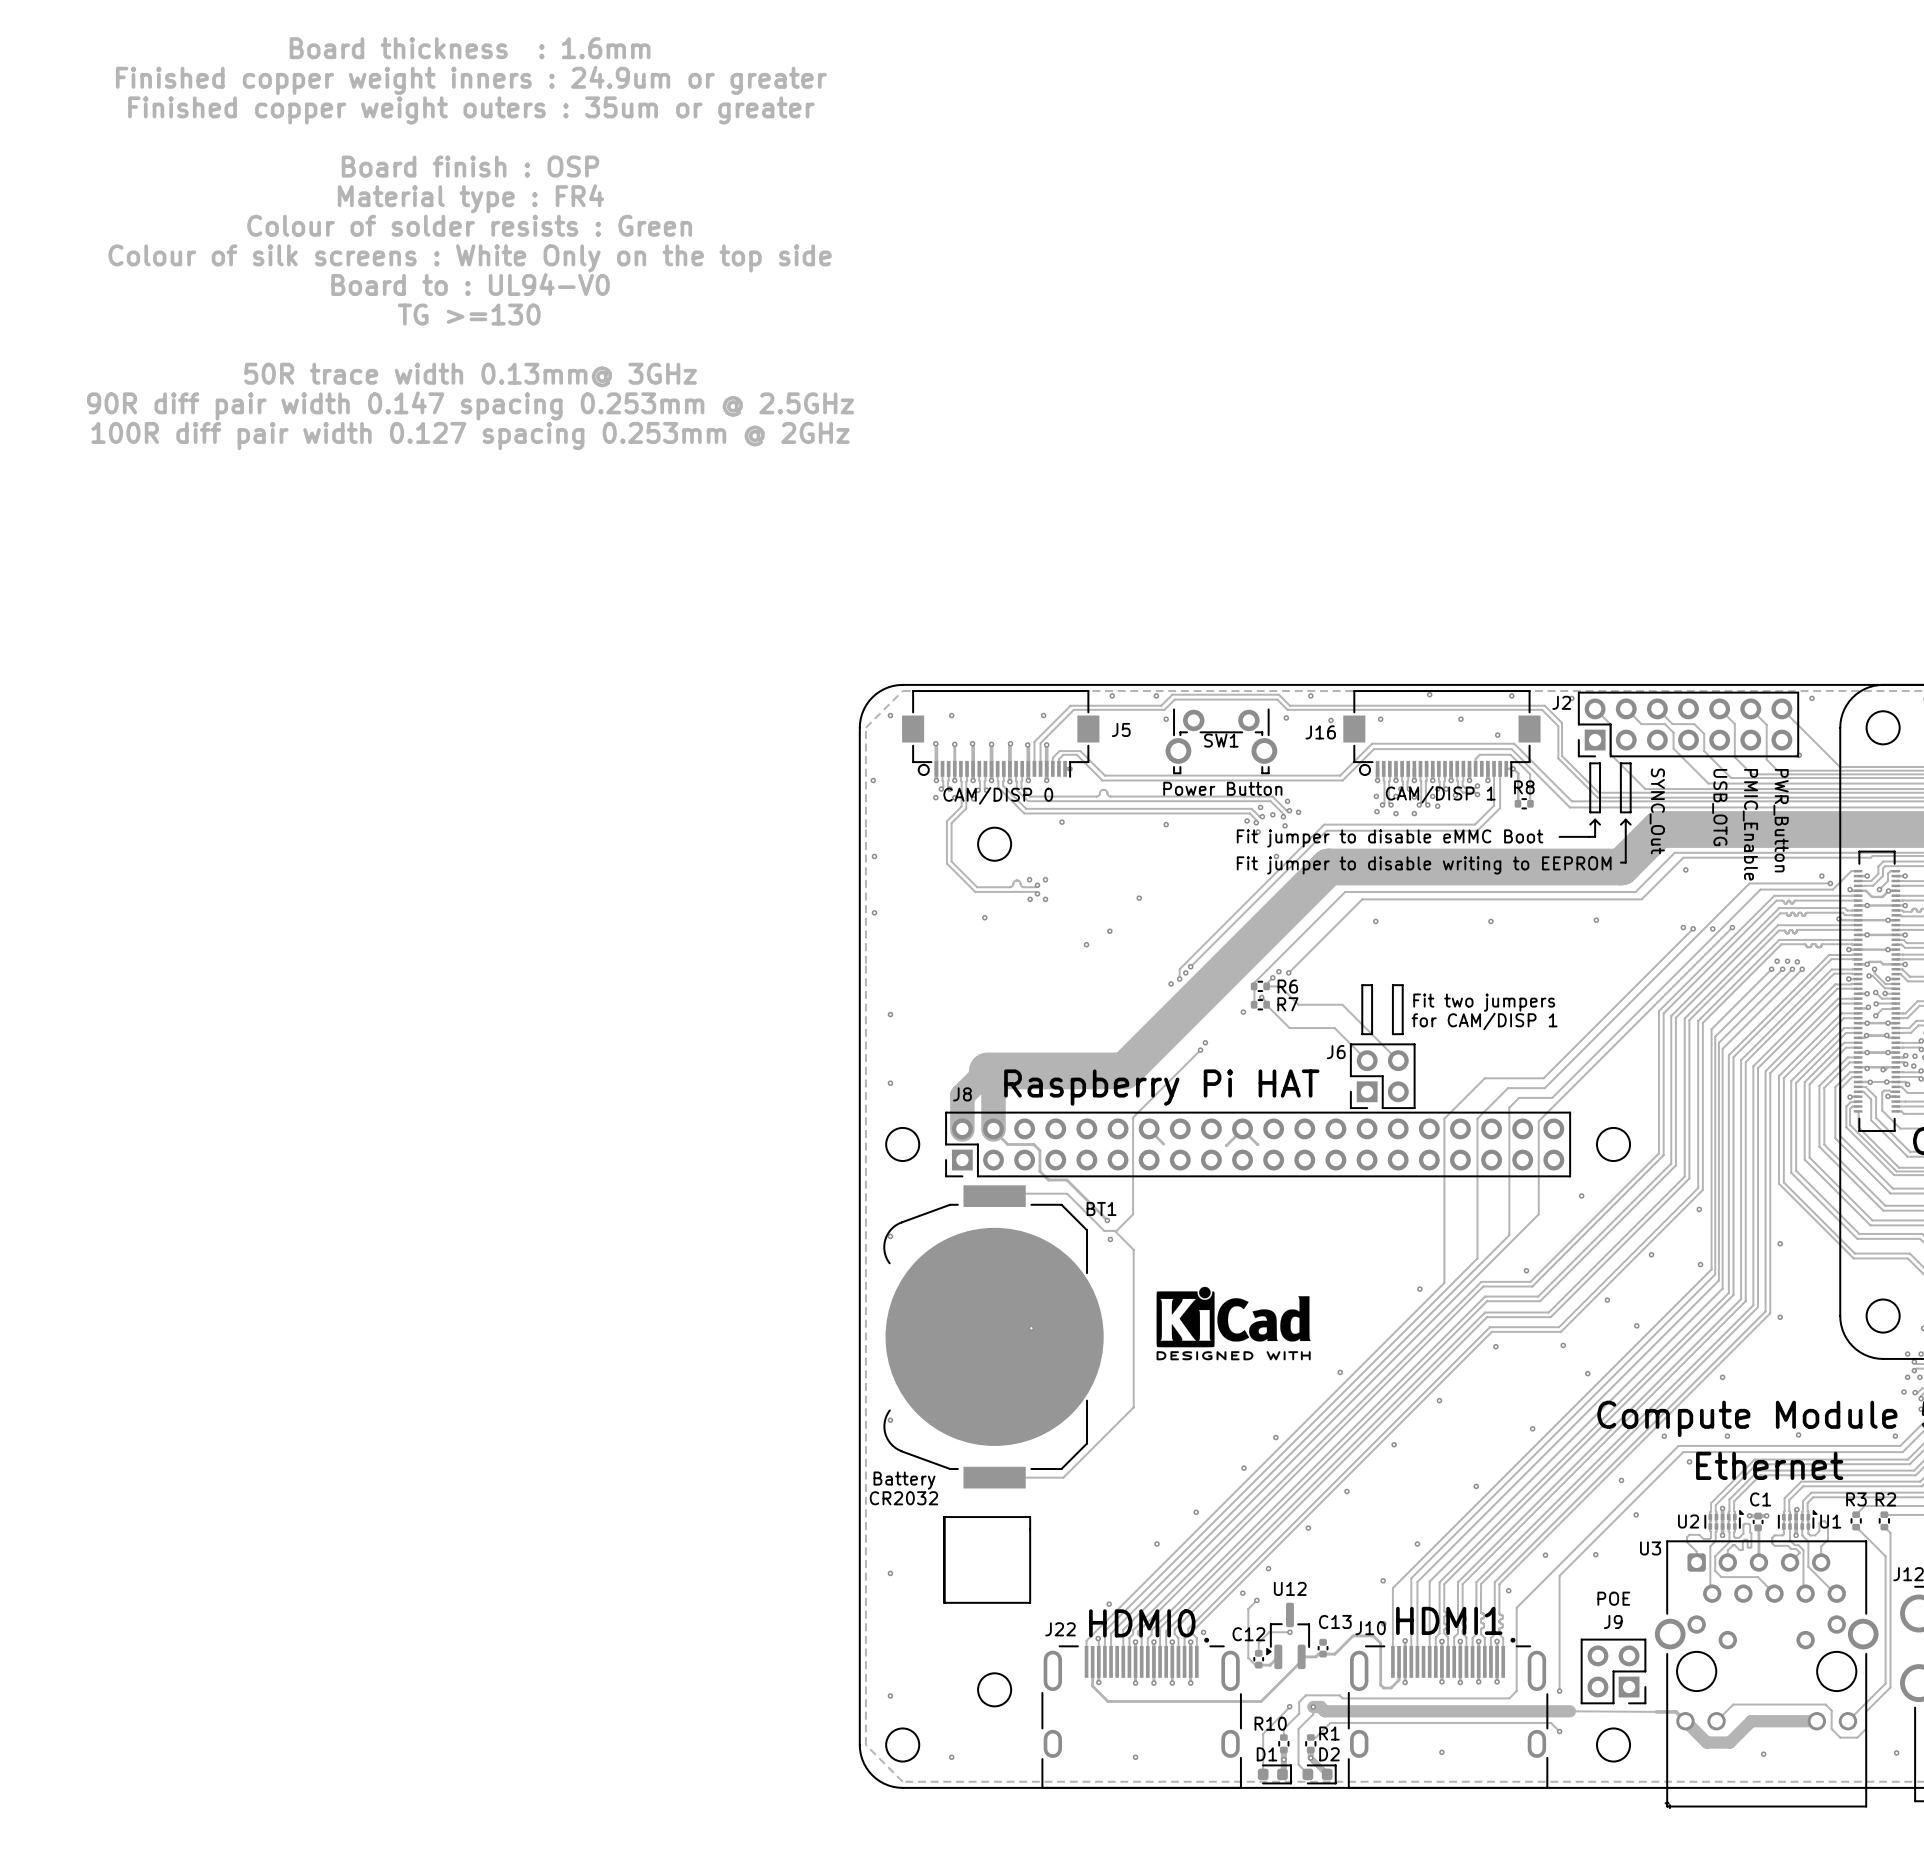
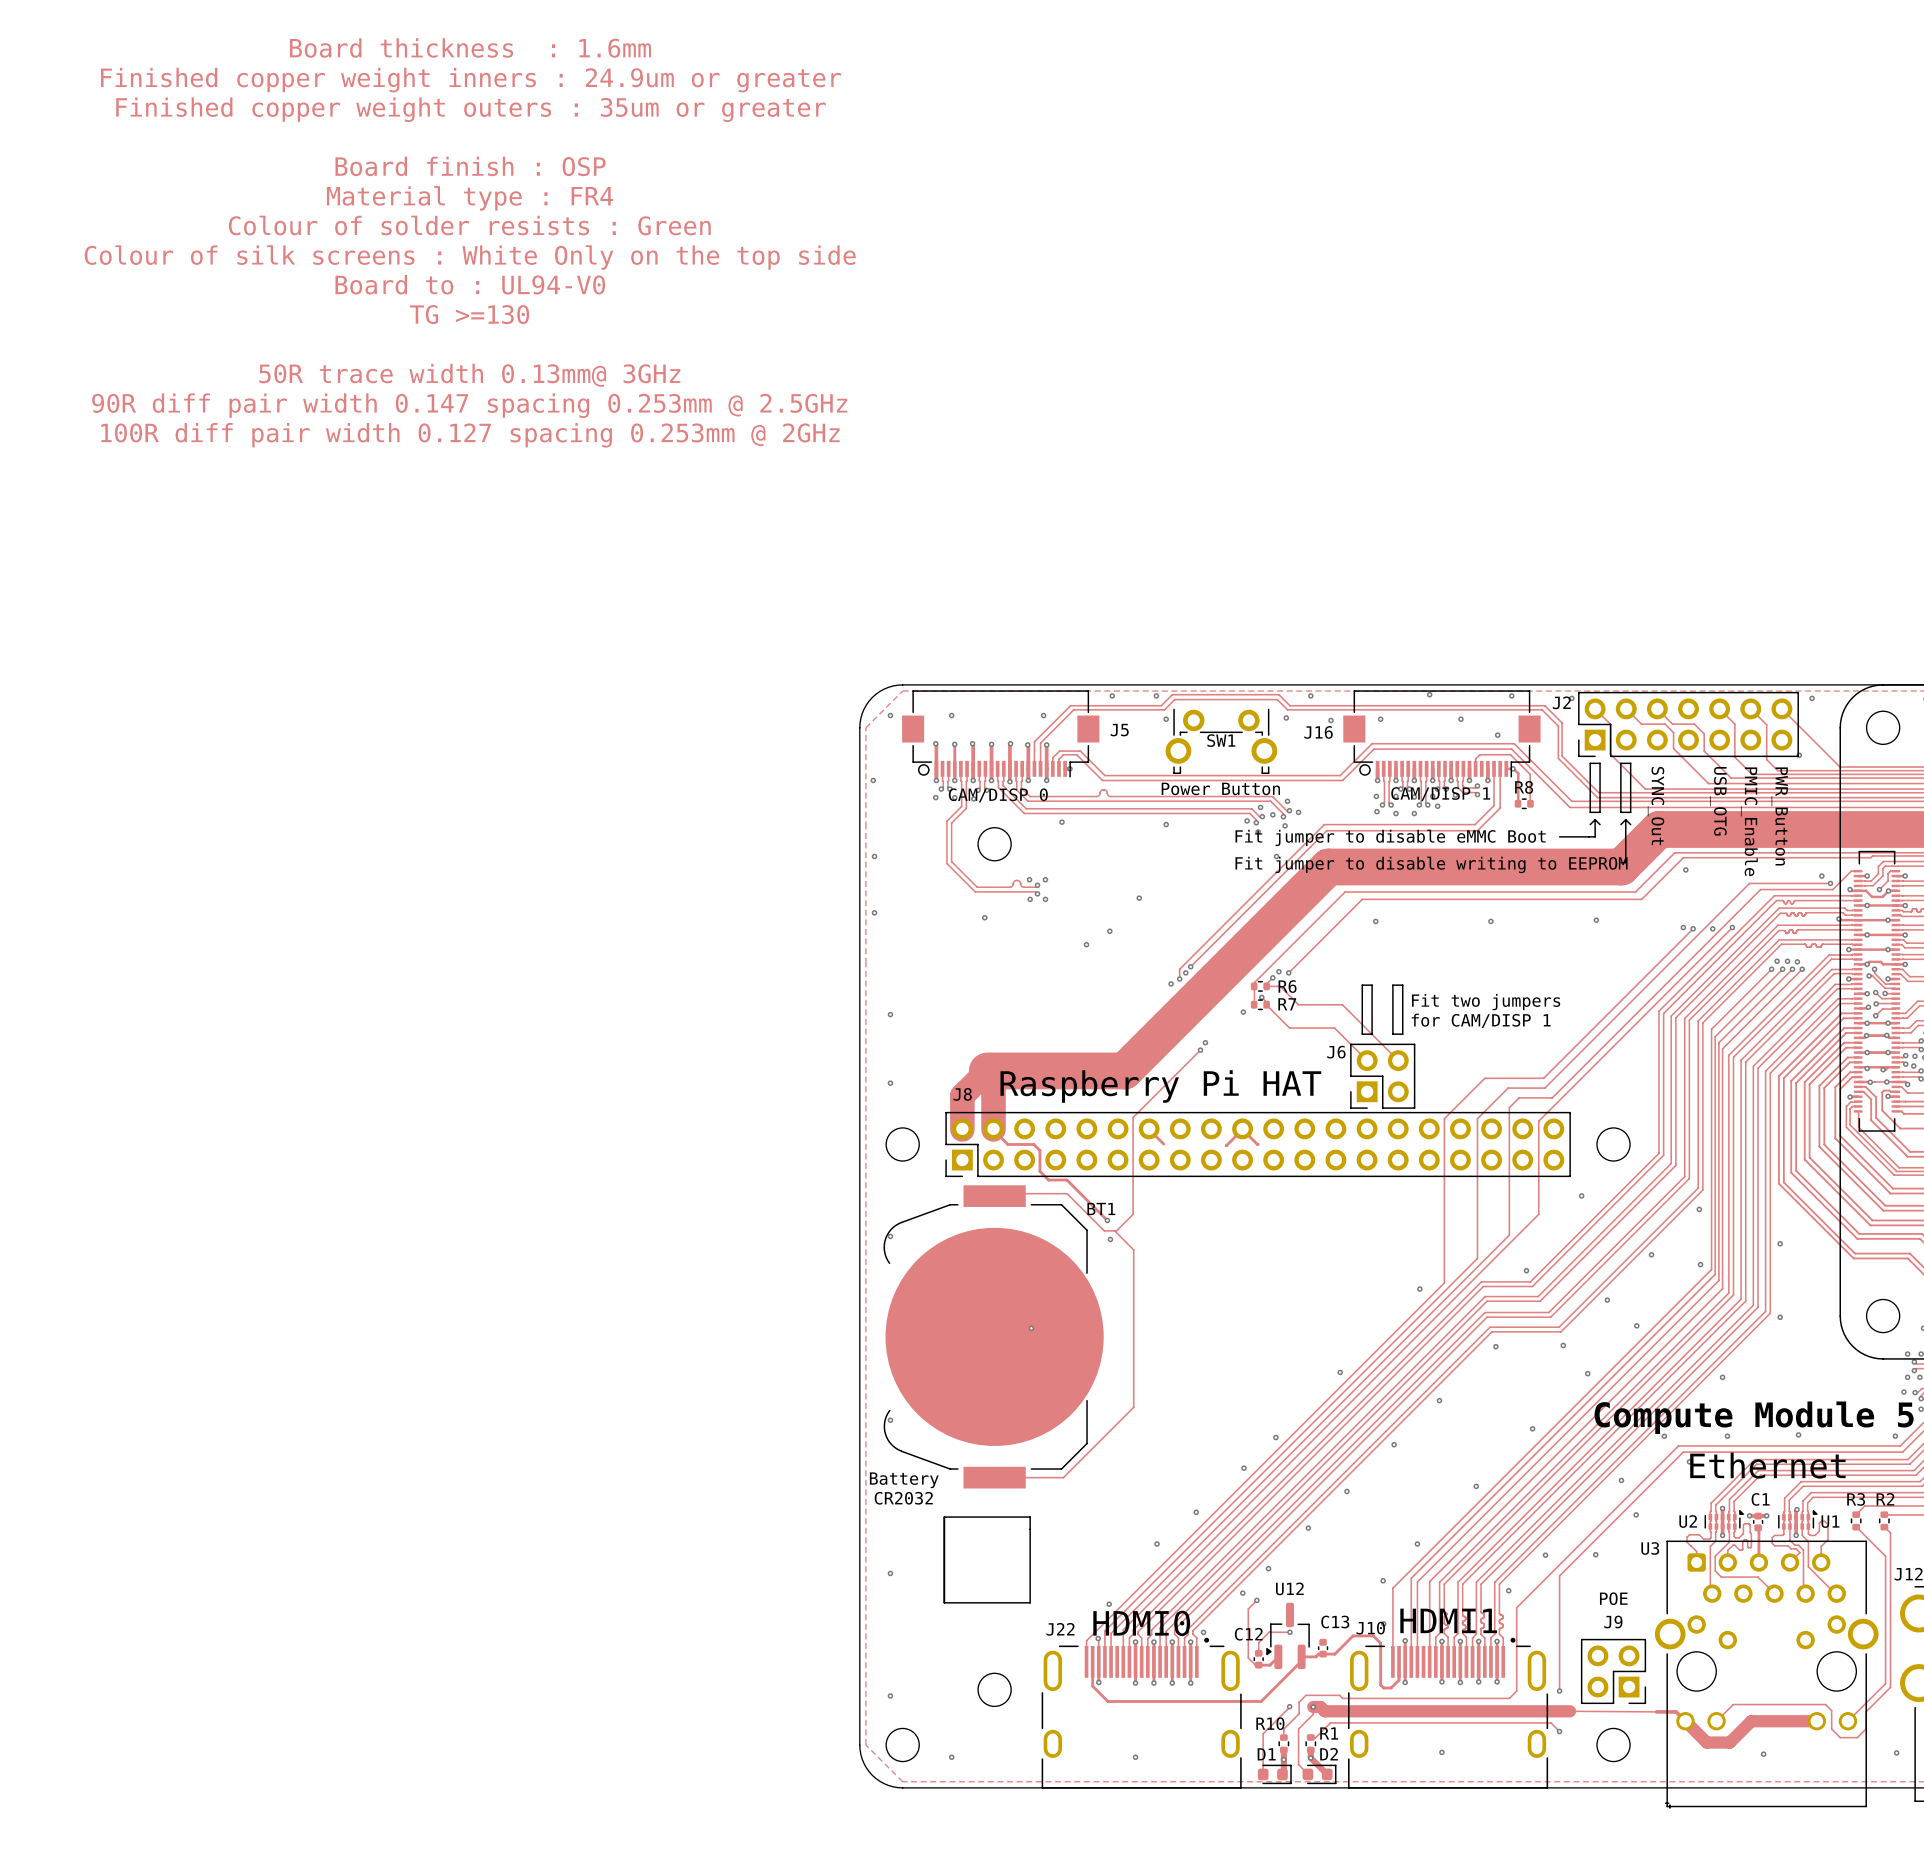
drawing: [1156, 1286, 1311, 1361] -> none

